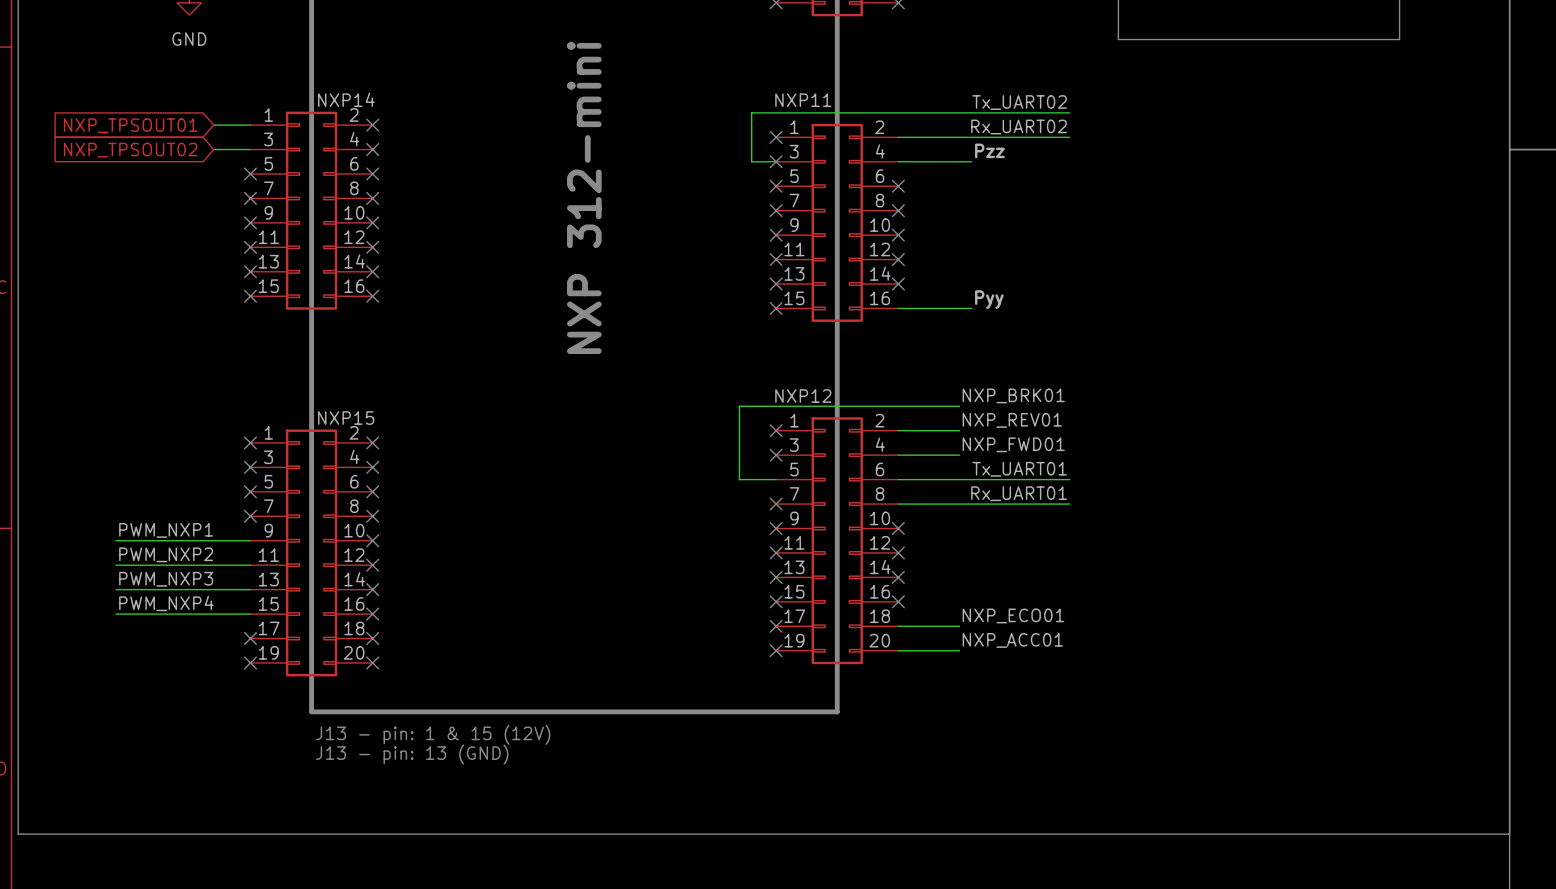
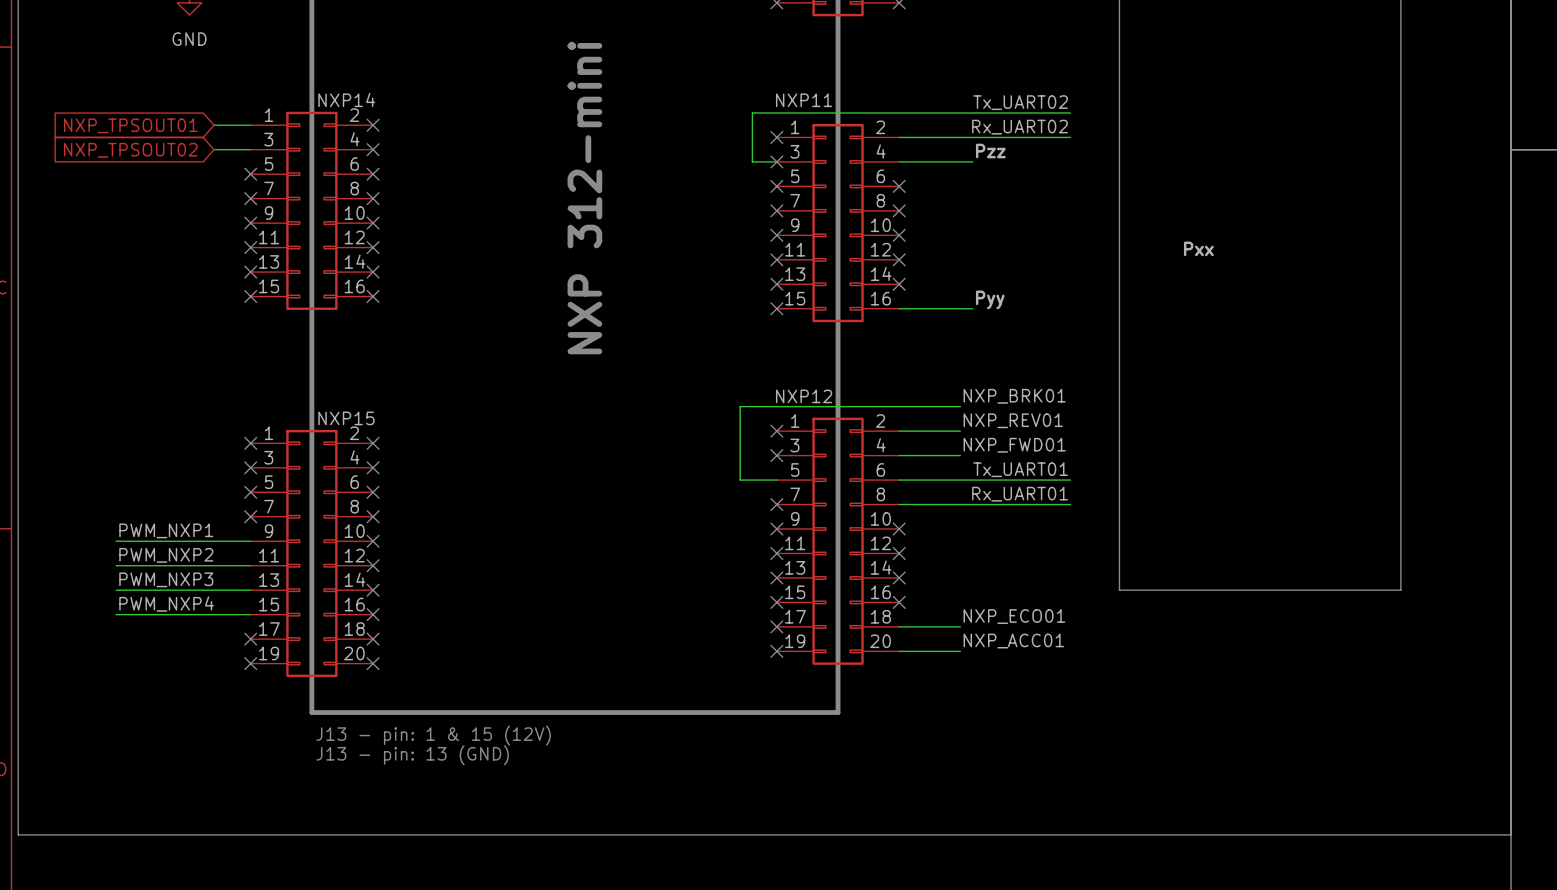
line: (1118, 39) (1399, 39) -> (1119, 39) (1119, 590) (1400, 590) (1400, 39)
label: none -> Pxx (1198, 248)

